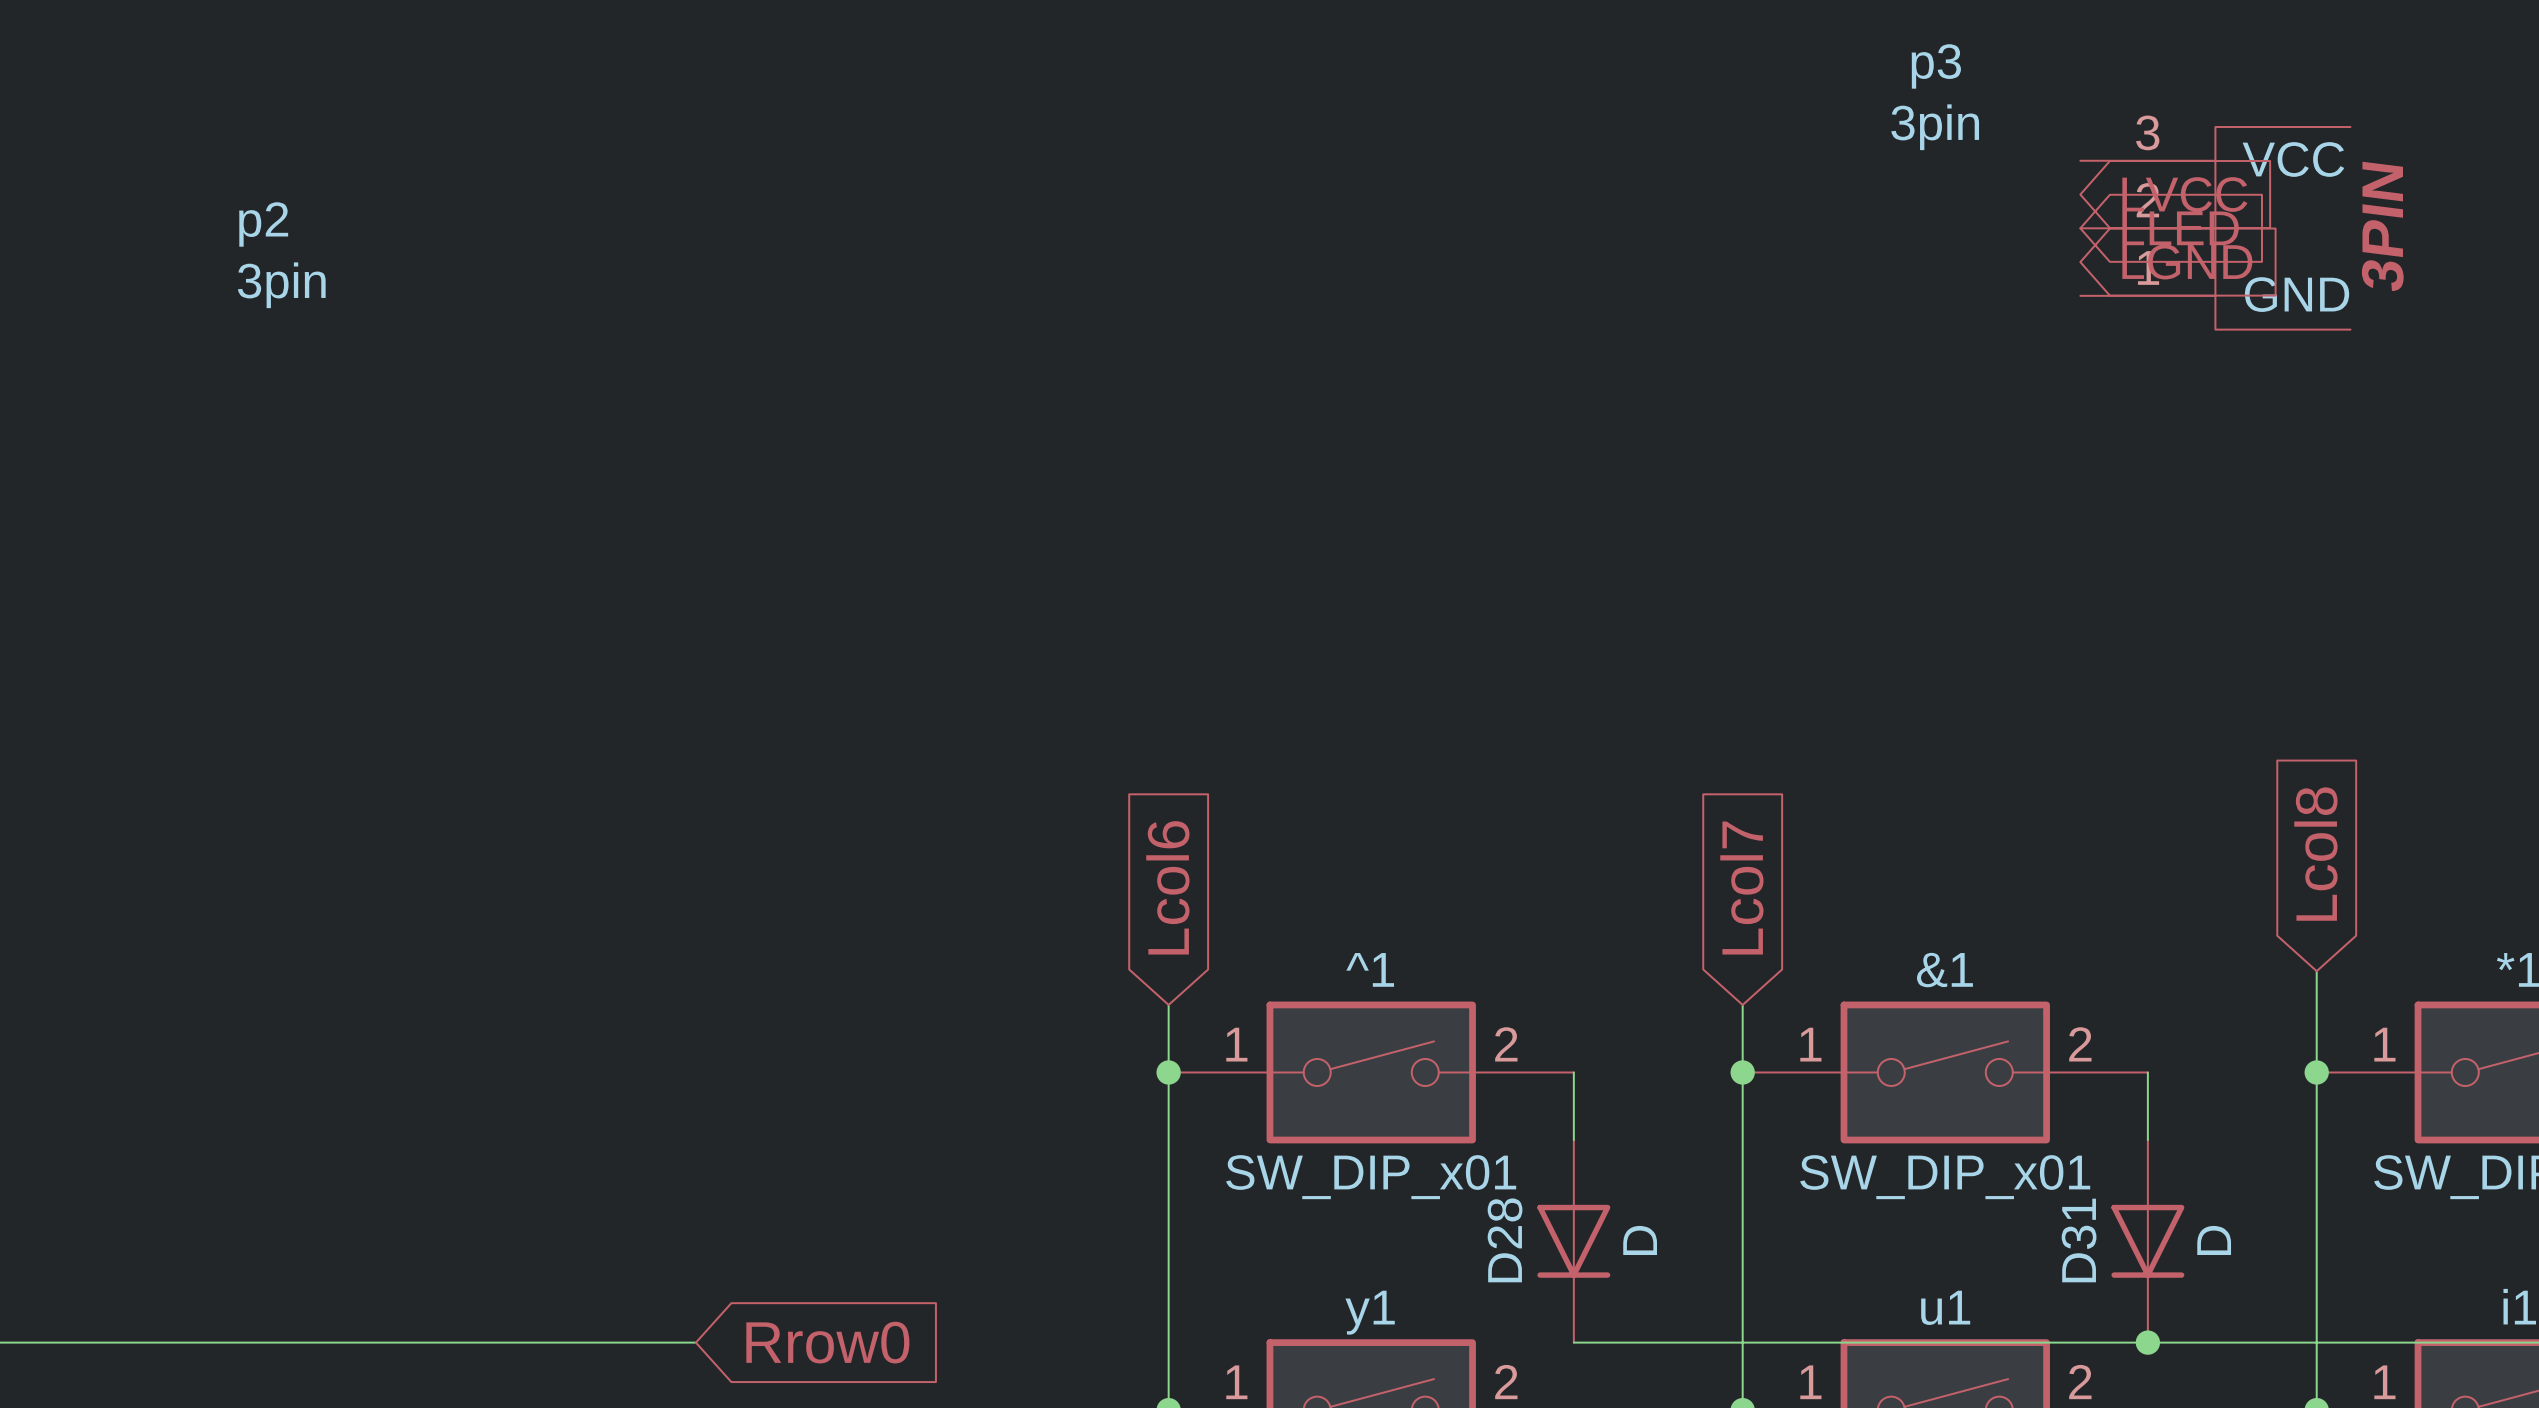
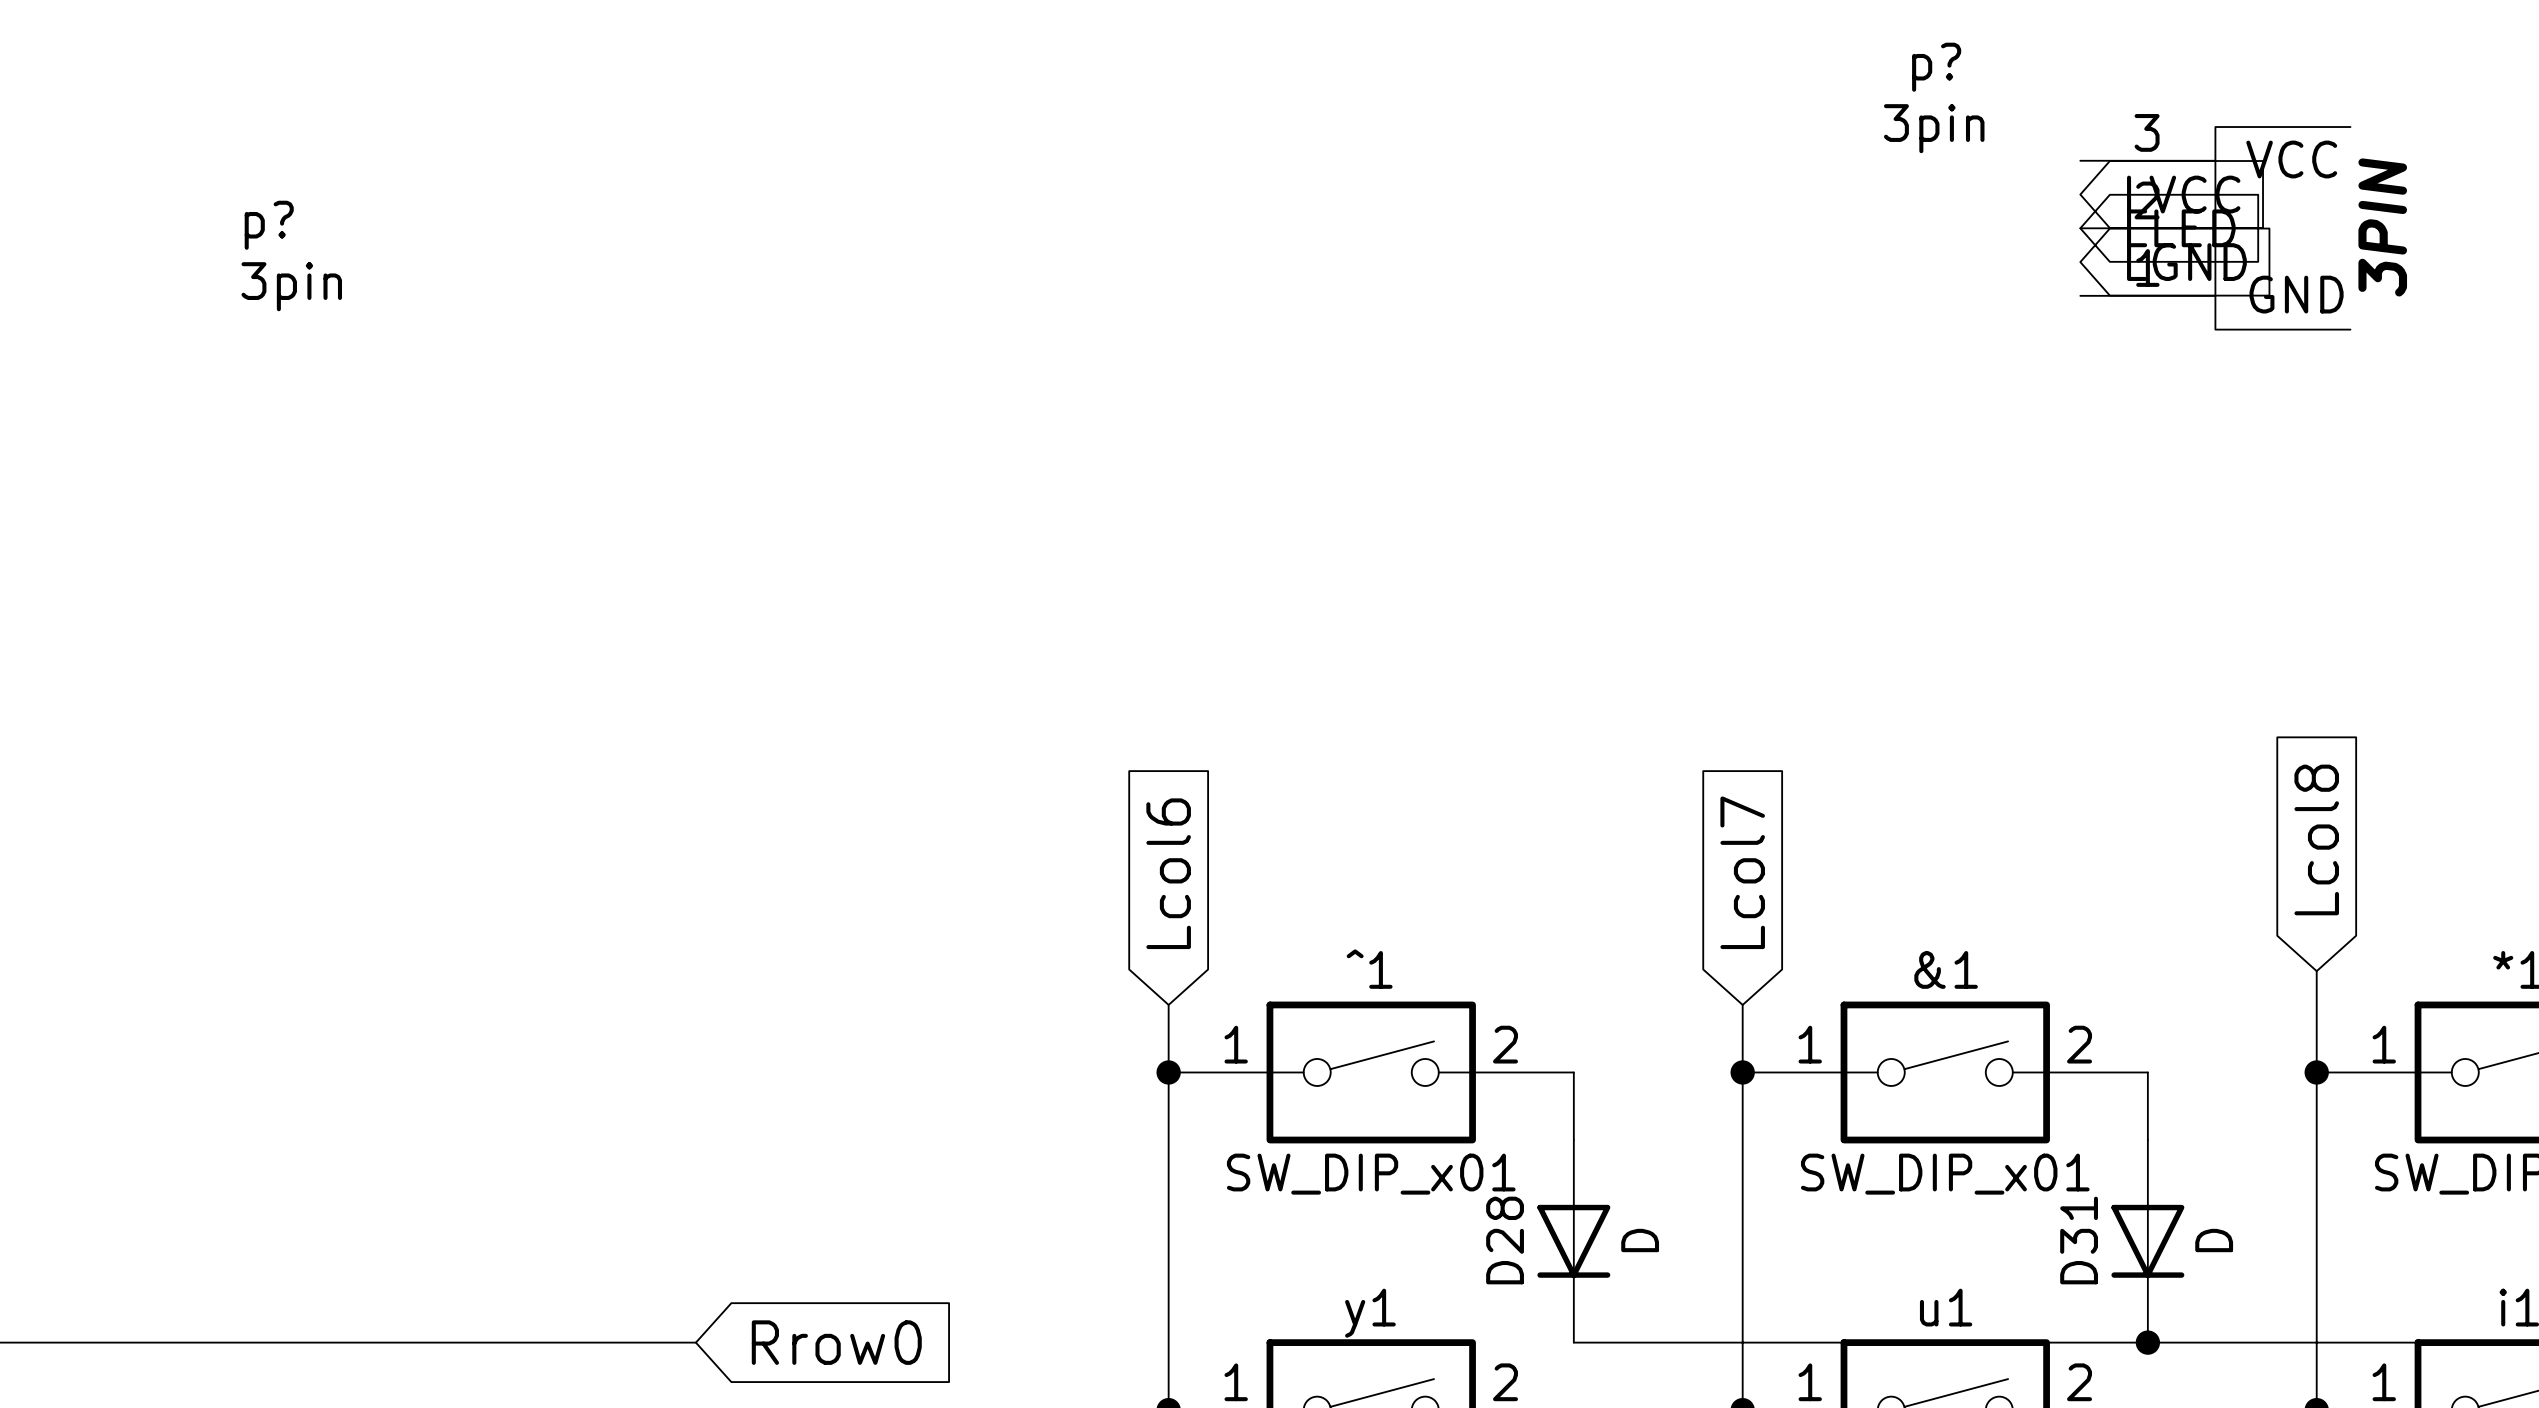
p3 name: p3 (1936, 66) -> p? (1936, 67)
p2 name: p2 (263, 224) -> p? (269, 225)

